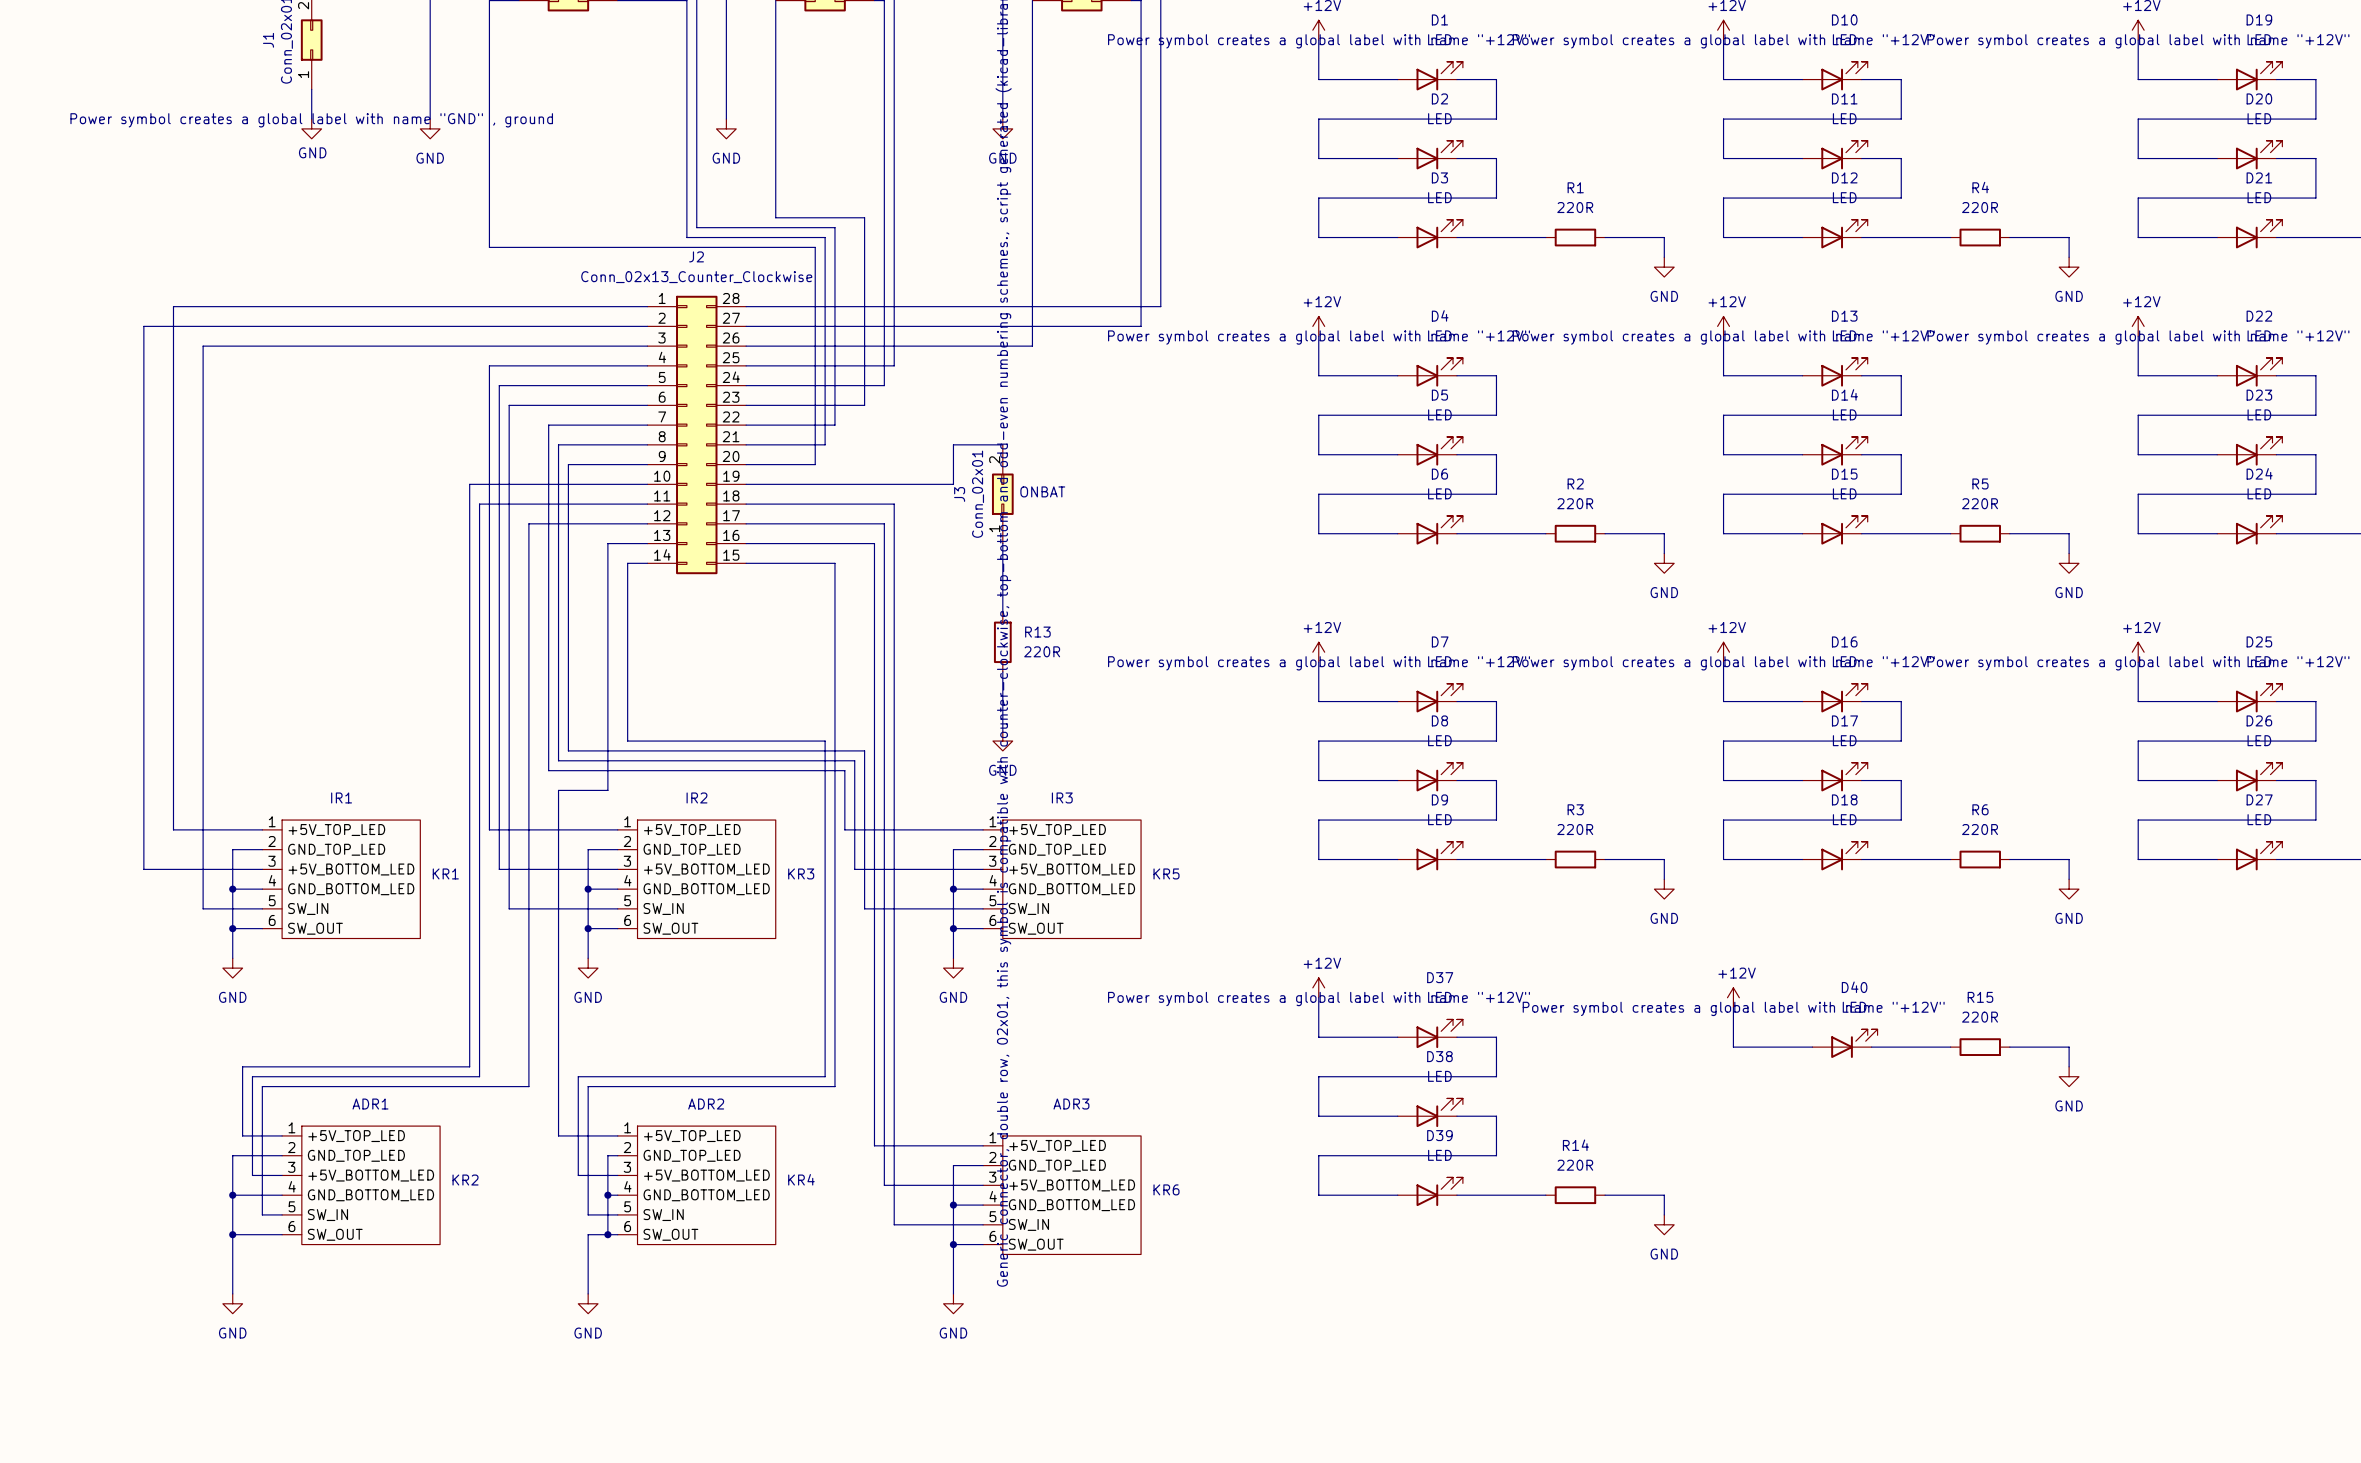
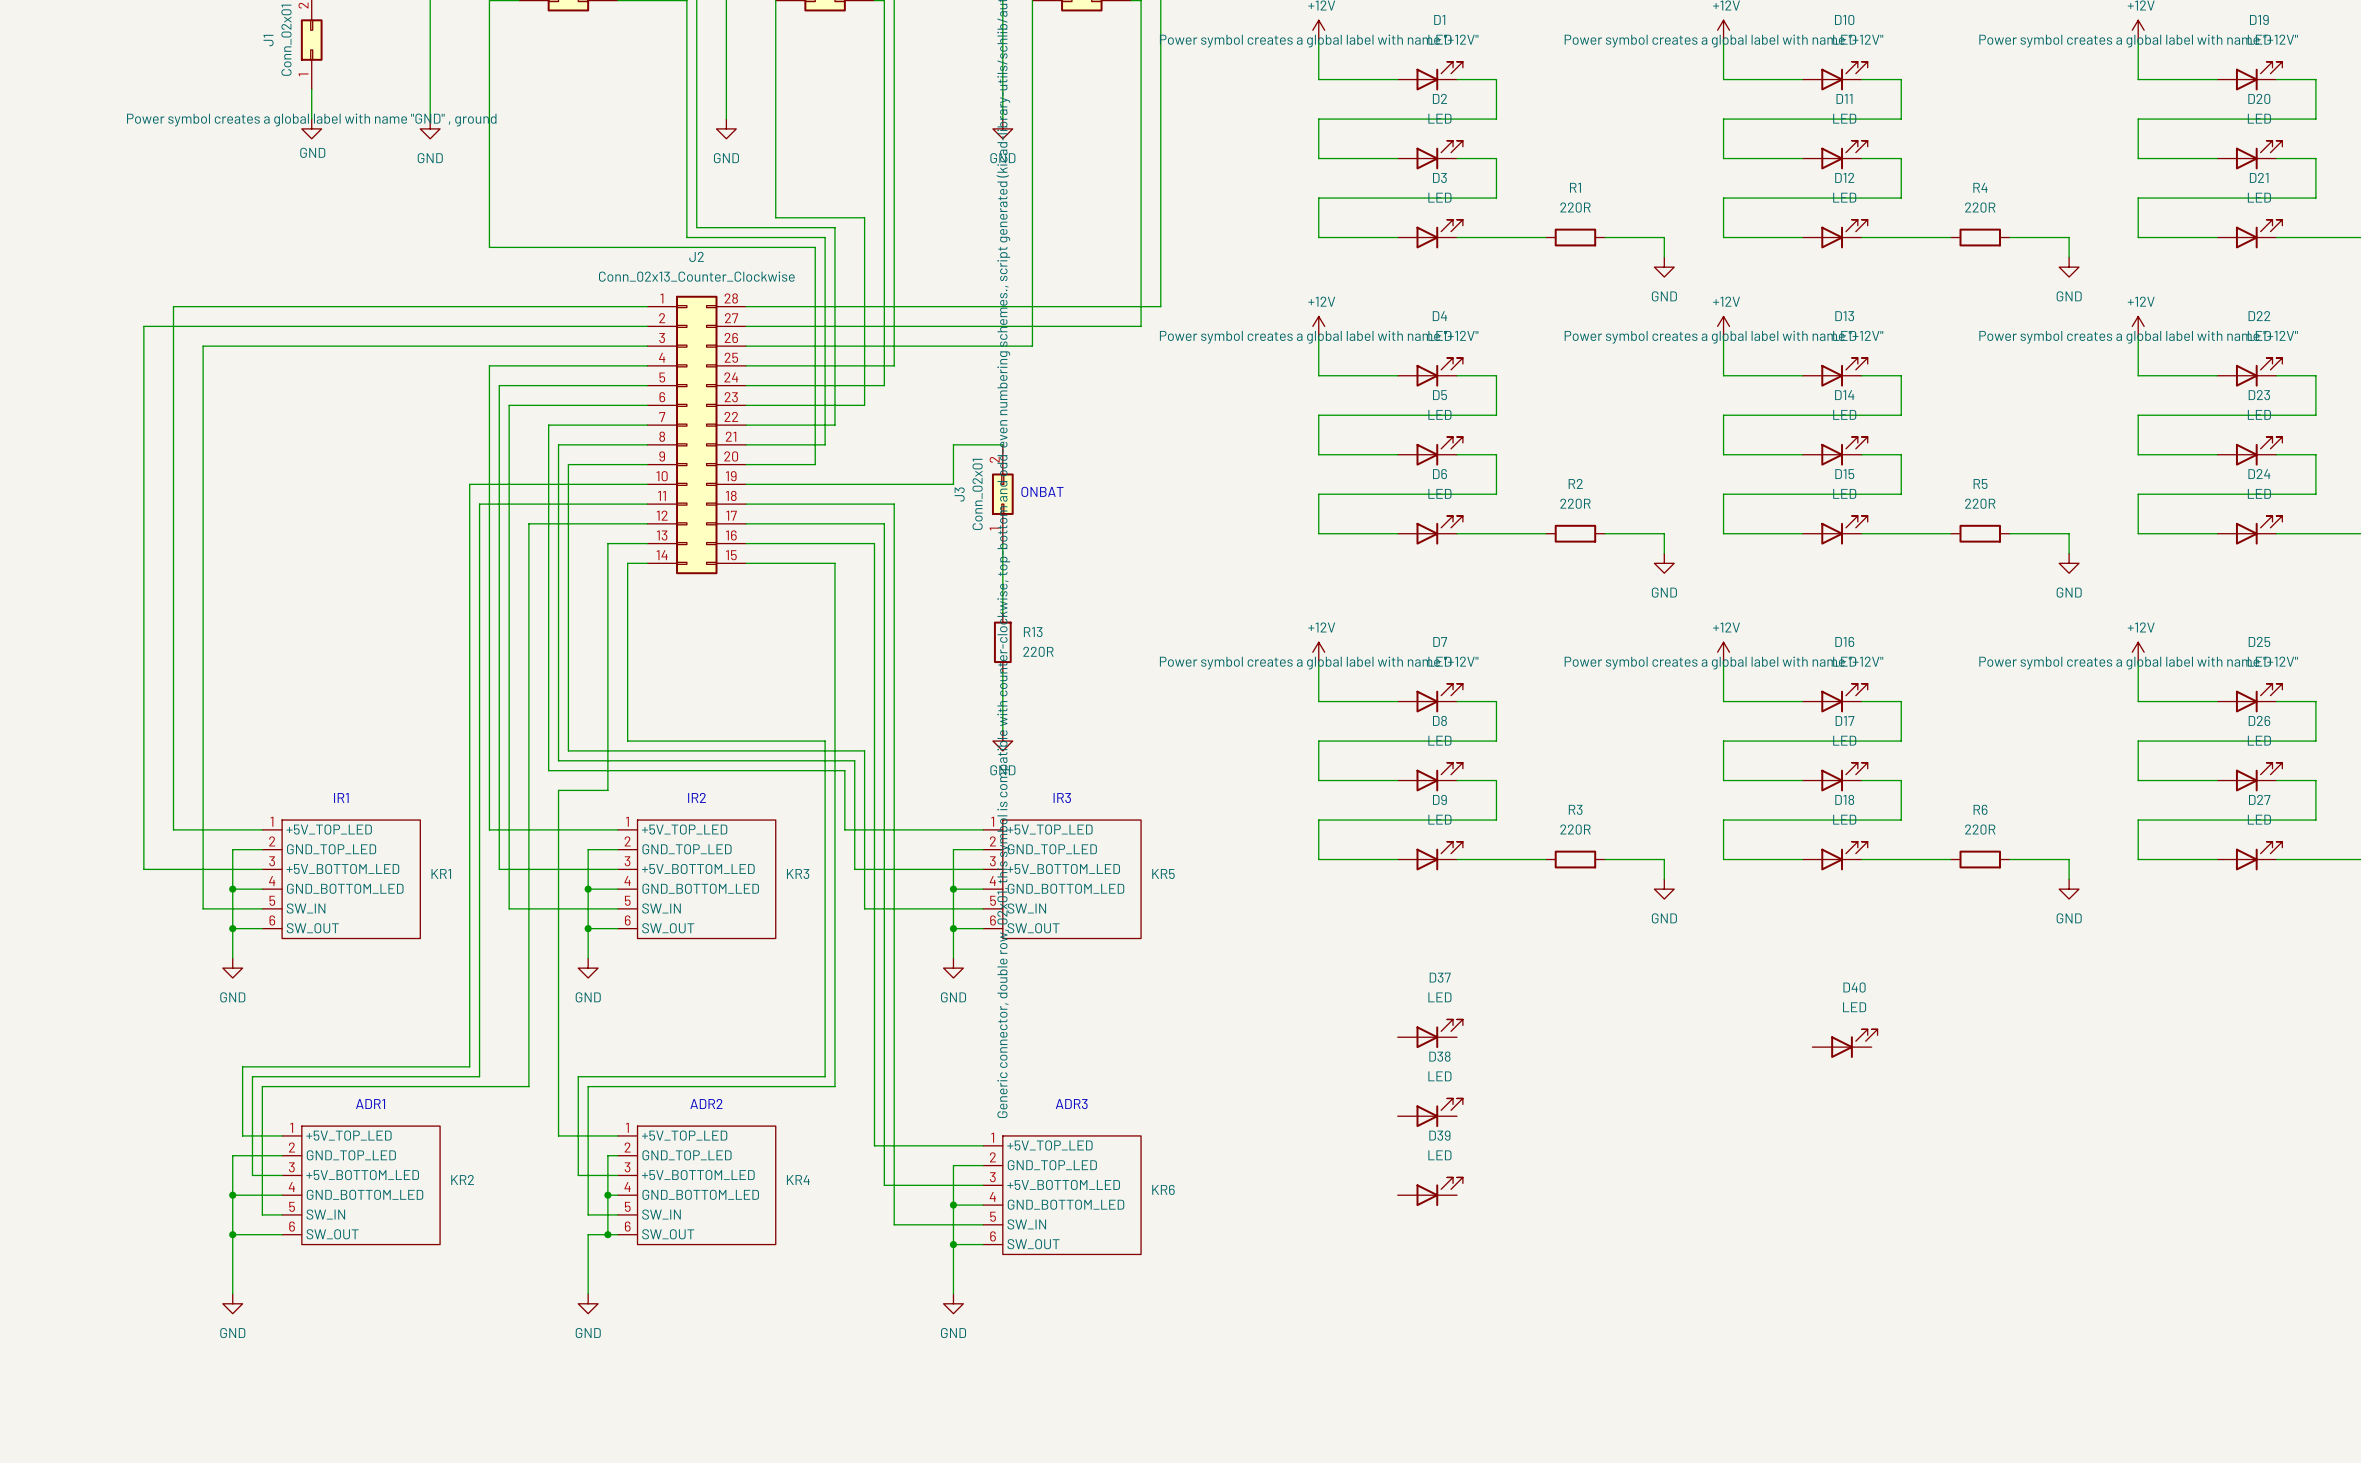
power symbol: +12V (1318, 987) -> none
wire: (1318, 997) (1318, 1037) (1397, 1037) -> none
power symbol: +12V (1733, 997) -> none
wire: (1733, 1007) (1733, 1047) (1812, 1047) -> none
wire: (1456, 1037) (1496, 1037) (1496, 1076) (1318, 1076) (1318, 1116) (1397, 1116) -> none
wire: (1871, 1047) (1950, 1047) -> none
R15: 220R (1980, 1047) -> none
wire: (2009, 1047) (2069, 1047) (2069, 1066) -> none
power symbol: GND (2069, 1076) -> none
wire: (1456, 1116) (1496, 1116) (1496, 1155) (1318, 1155) (1318, 1195) (1397, 1195) -> none
wire: (1456, 1195) (1545, 1195) -> none
R14: 220R (1575, 1195) -> none
wire: (1605, 1195) (1664, 1195) (1664, 1214) -> none
power symbol: GND (1664, 1224) -> none

